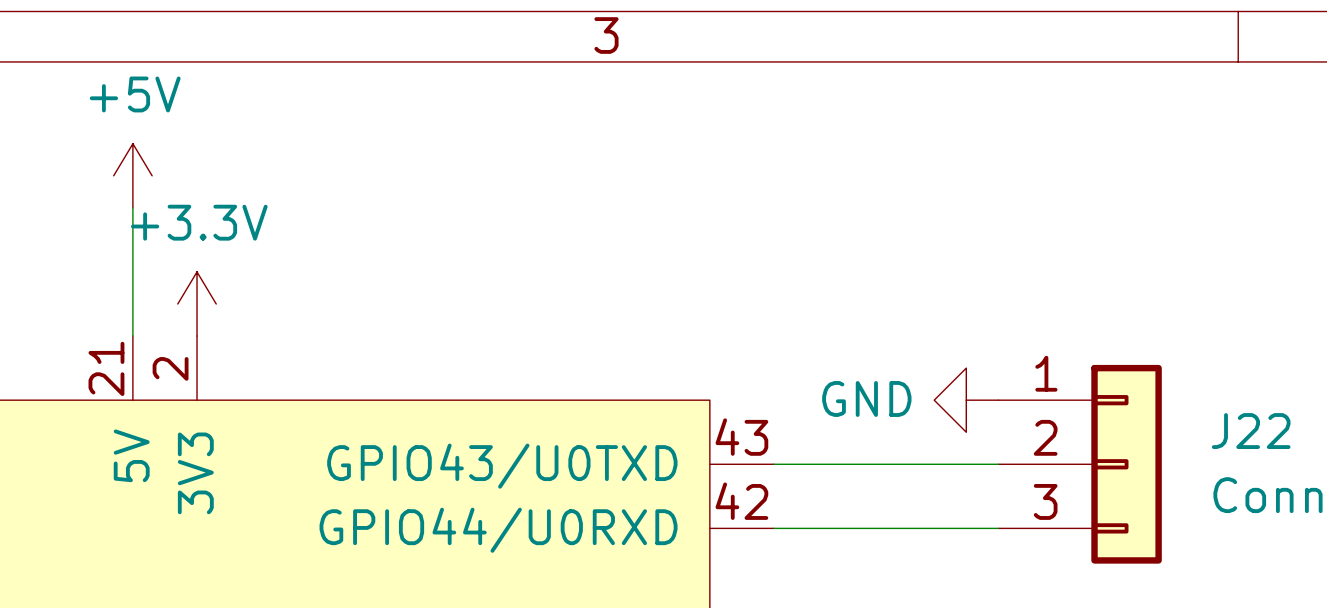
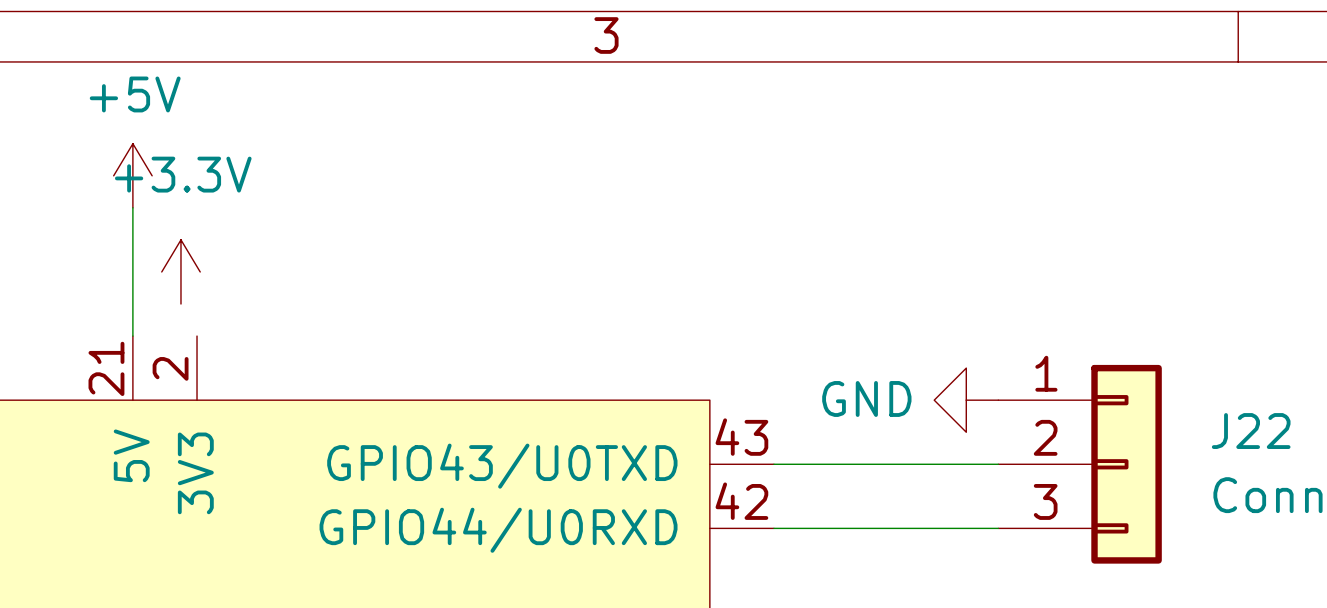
power symbol text position: +3.3V (199, 222) -> +3.3V (183, 174)
power symbol position: +3.3V (197, 304) -> +3.3V (180, 271)

